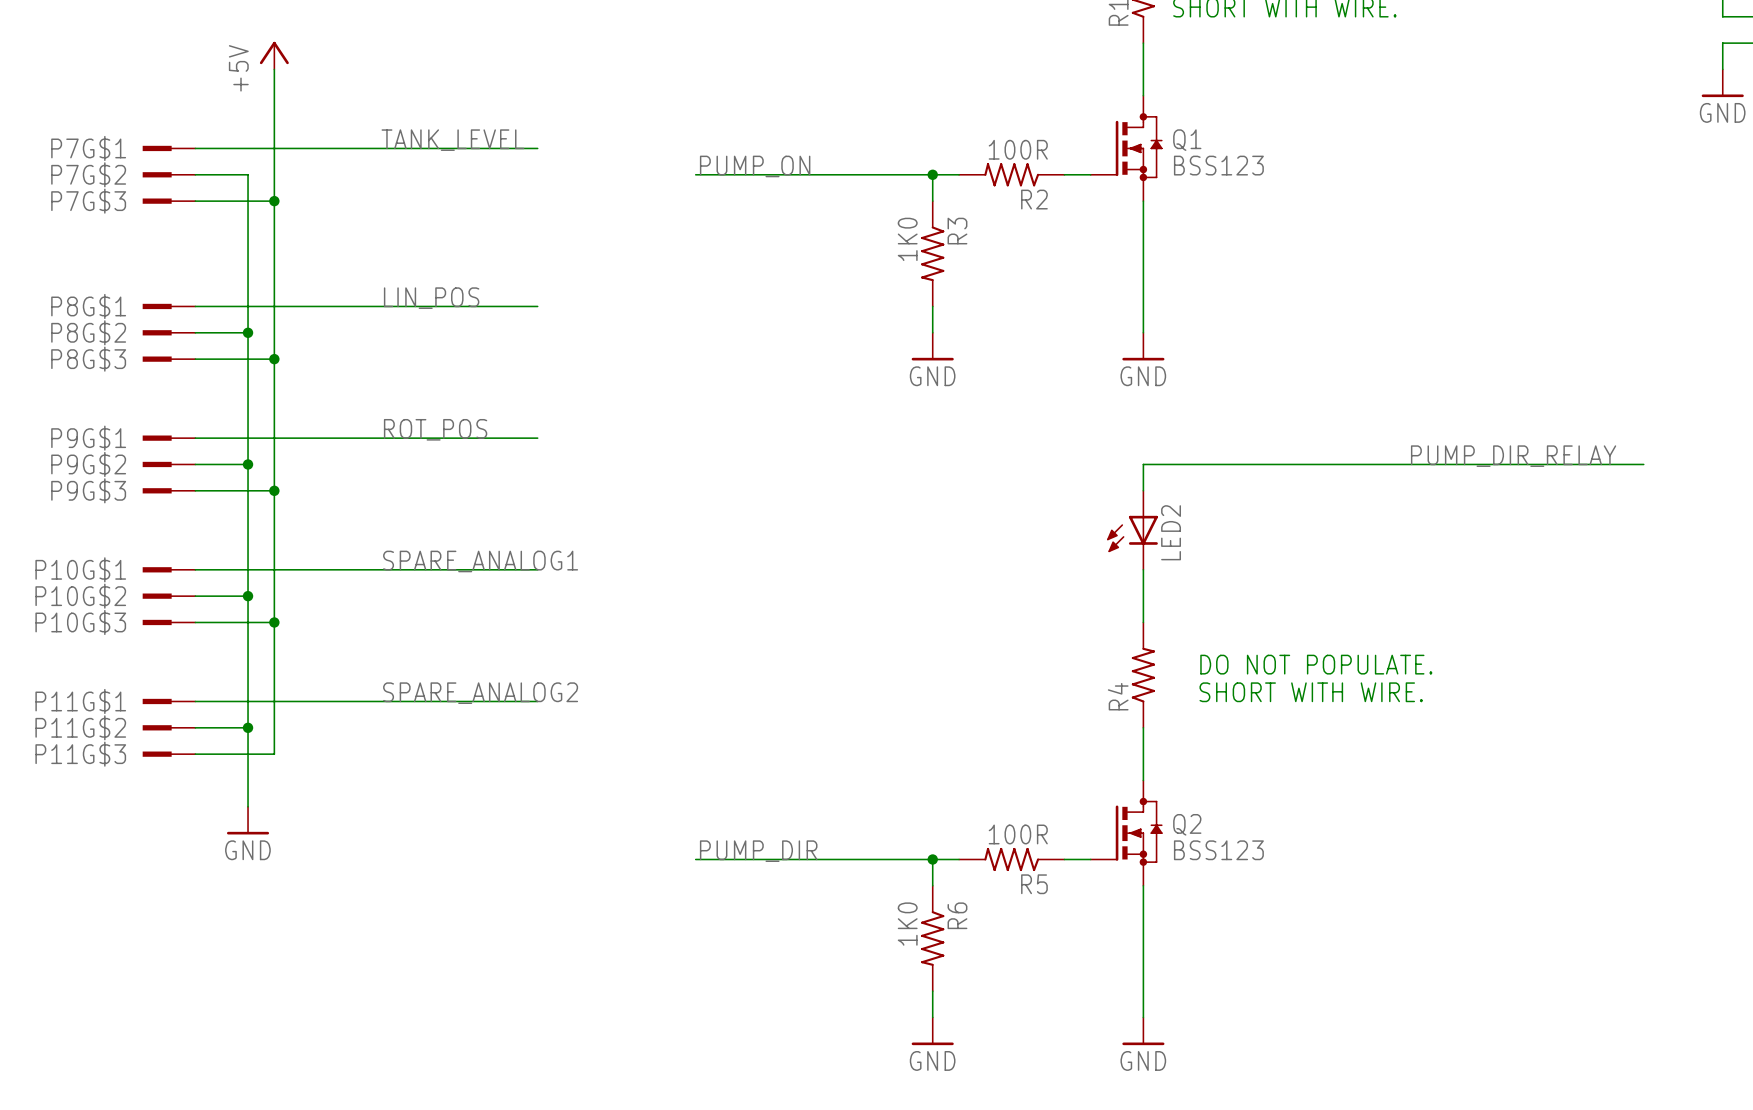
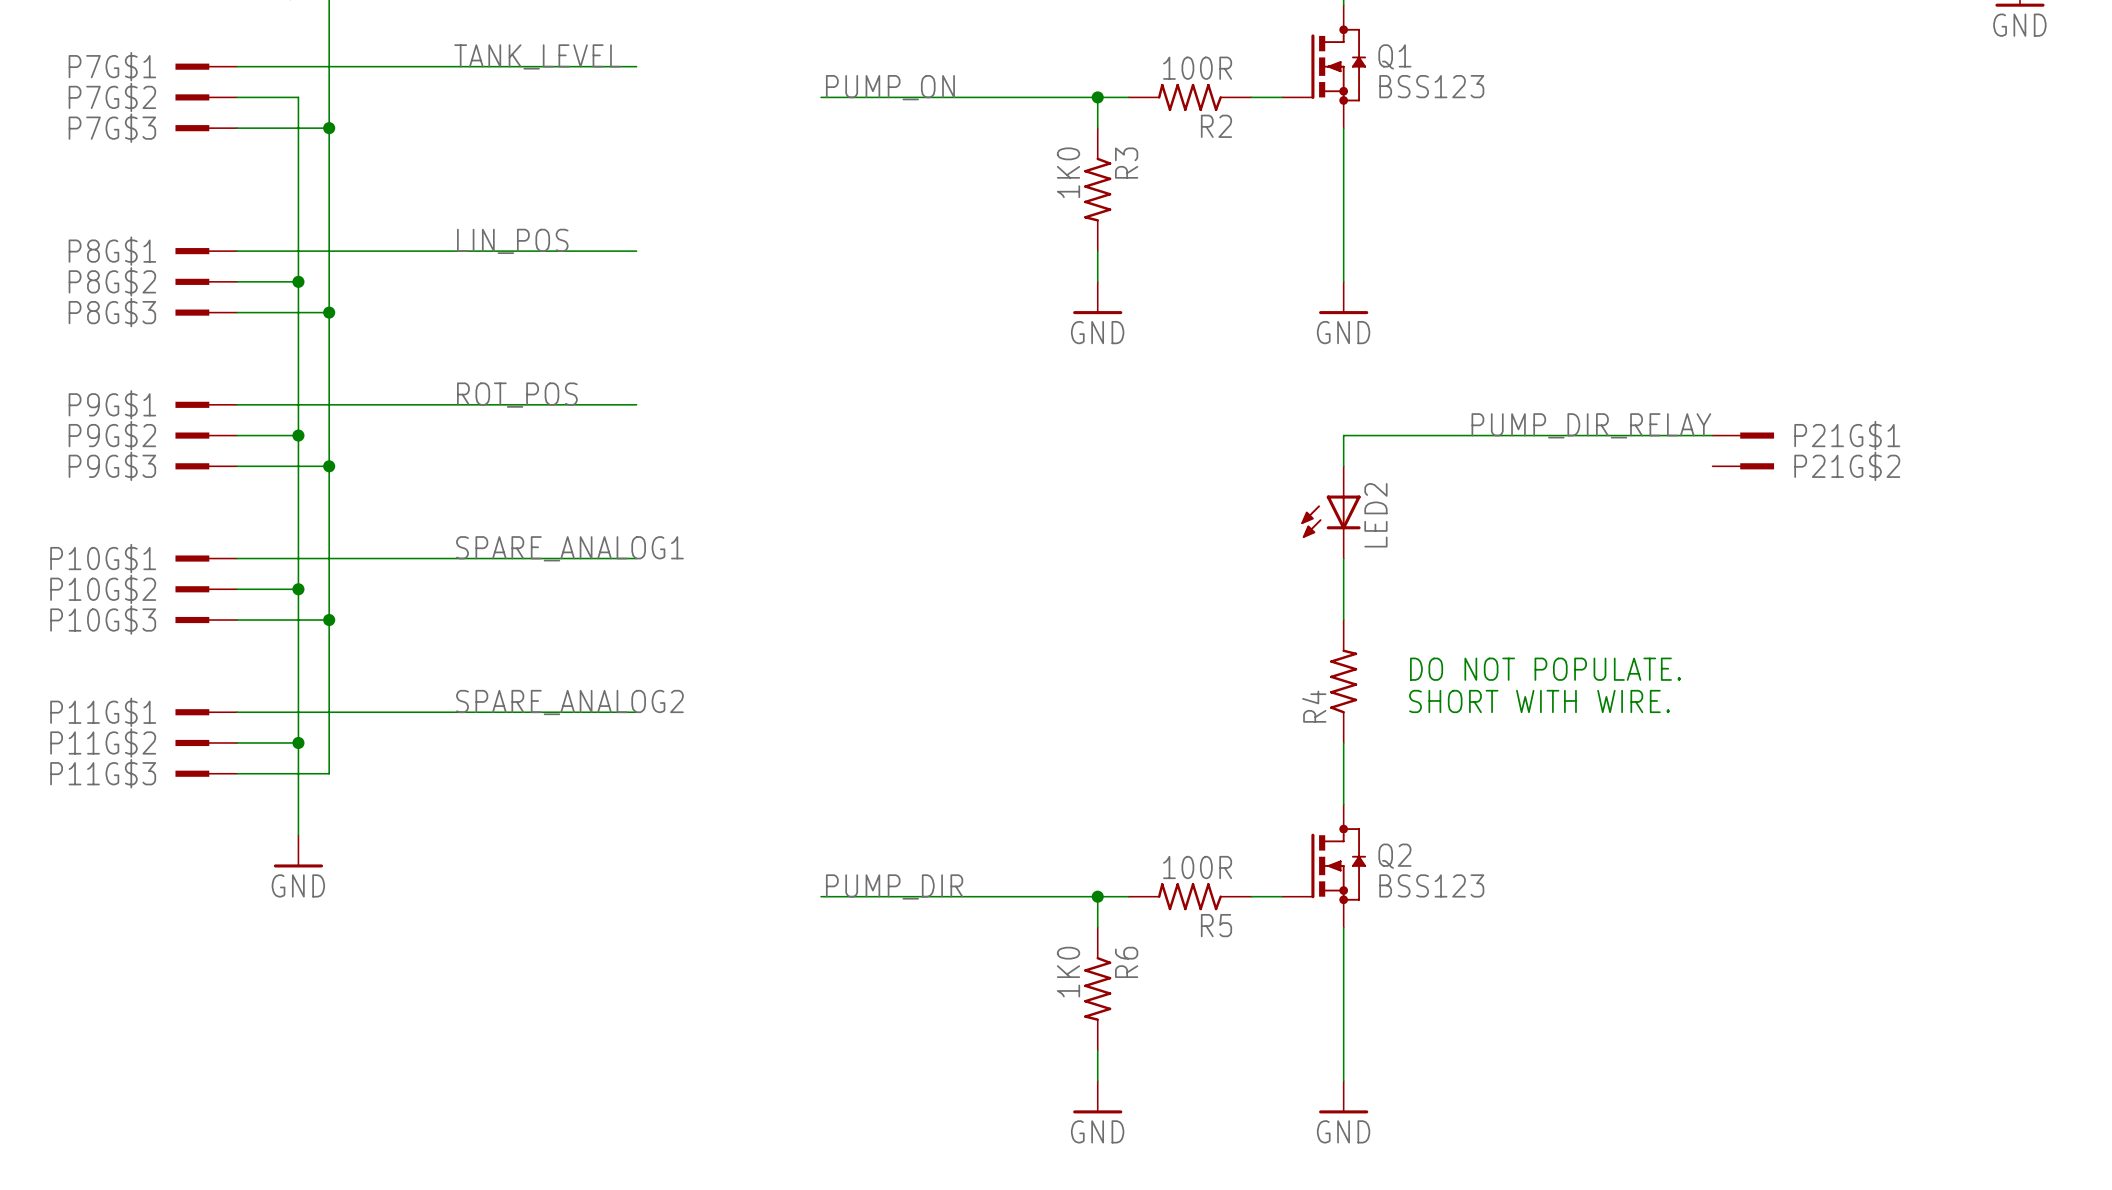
label position: PUMP_DIR_RELAY (1513, 456) -> PUMP_DIR_RELAY (1591, 425)
wire: (1459, 464) (1643, 464) -> none
P21G$1: none -> (1743, 435)
P21G$2: none -> (1743, 466)

